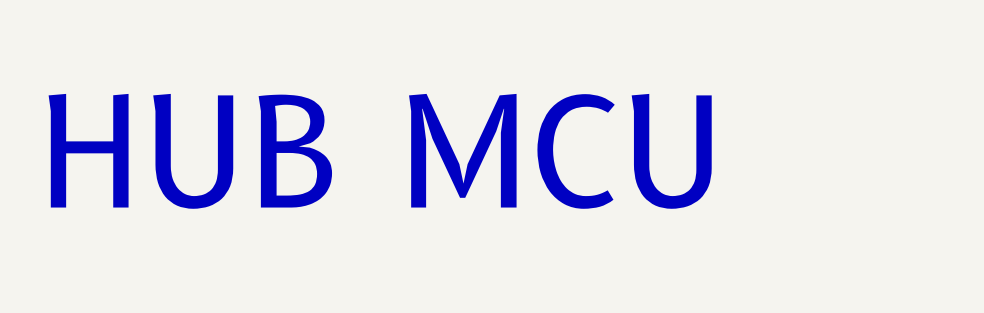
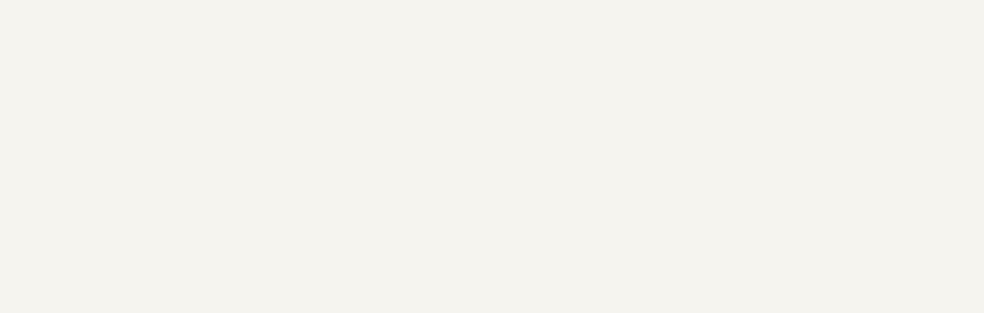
text: HUB MCU (380, 151) -> none

